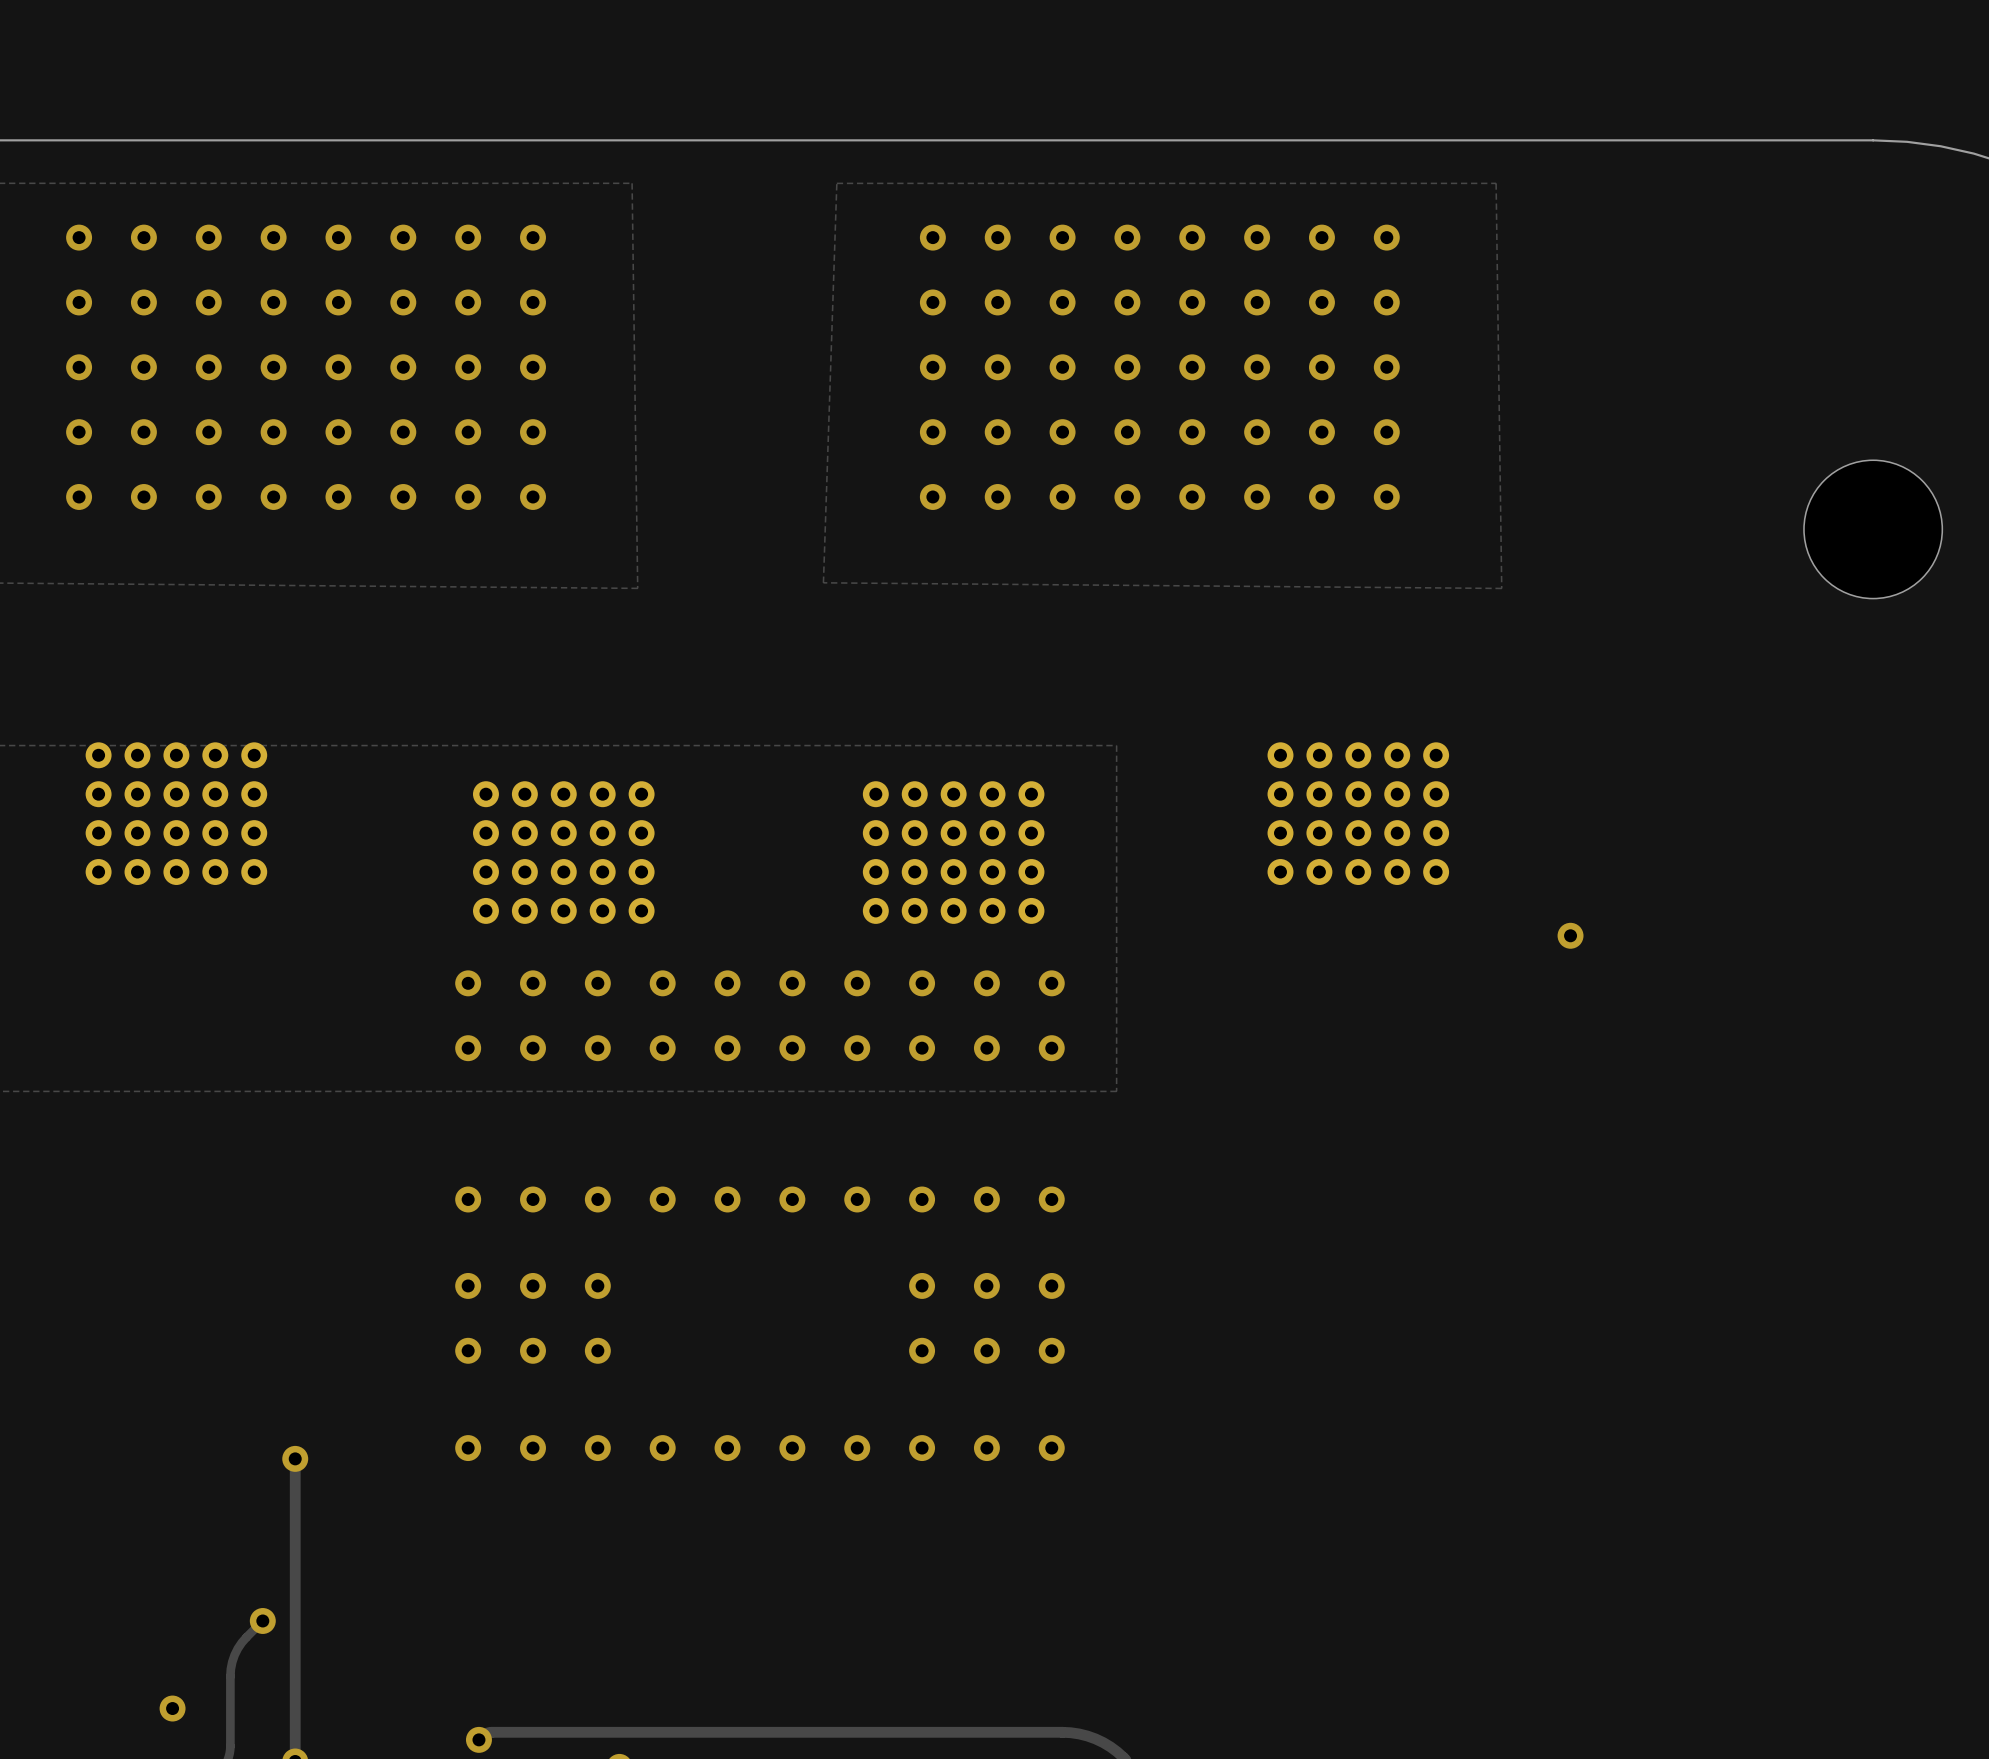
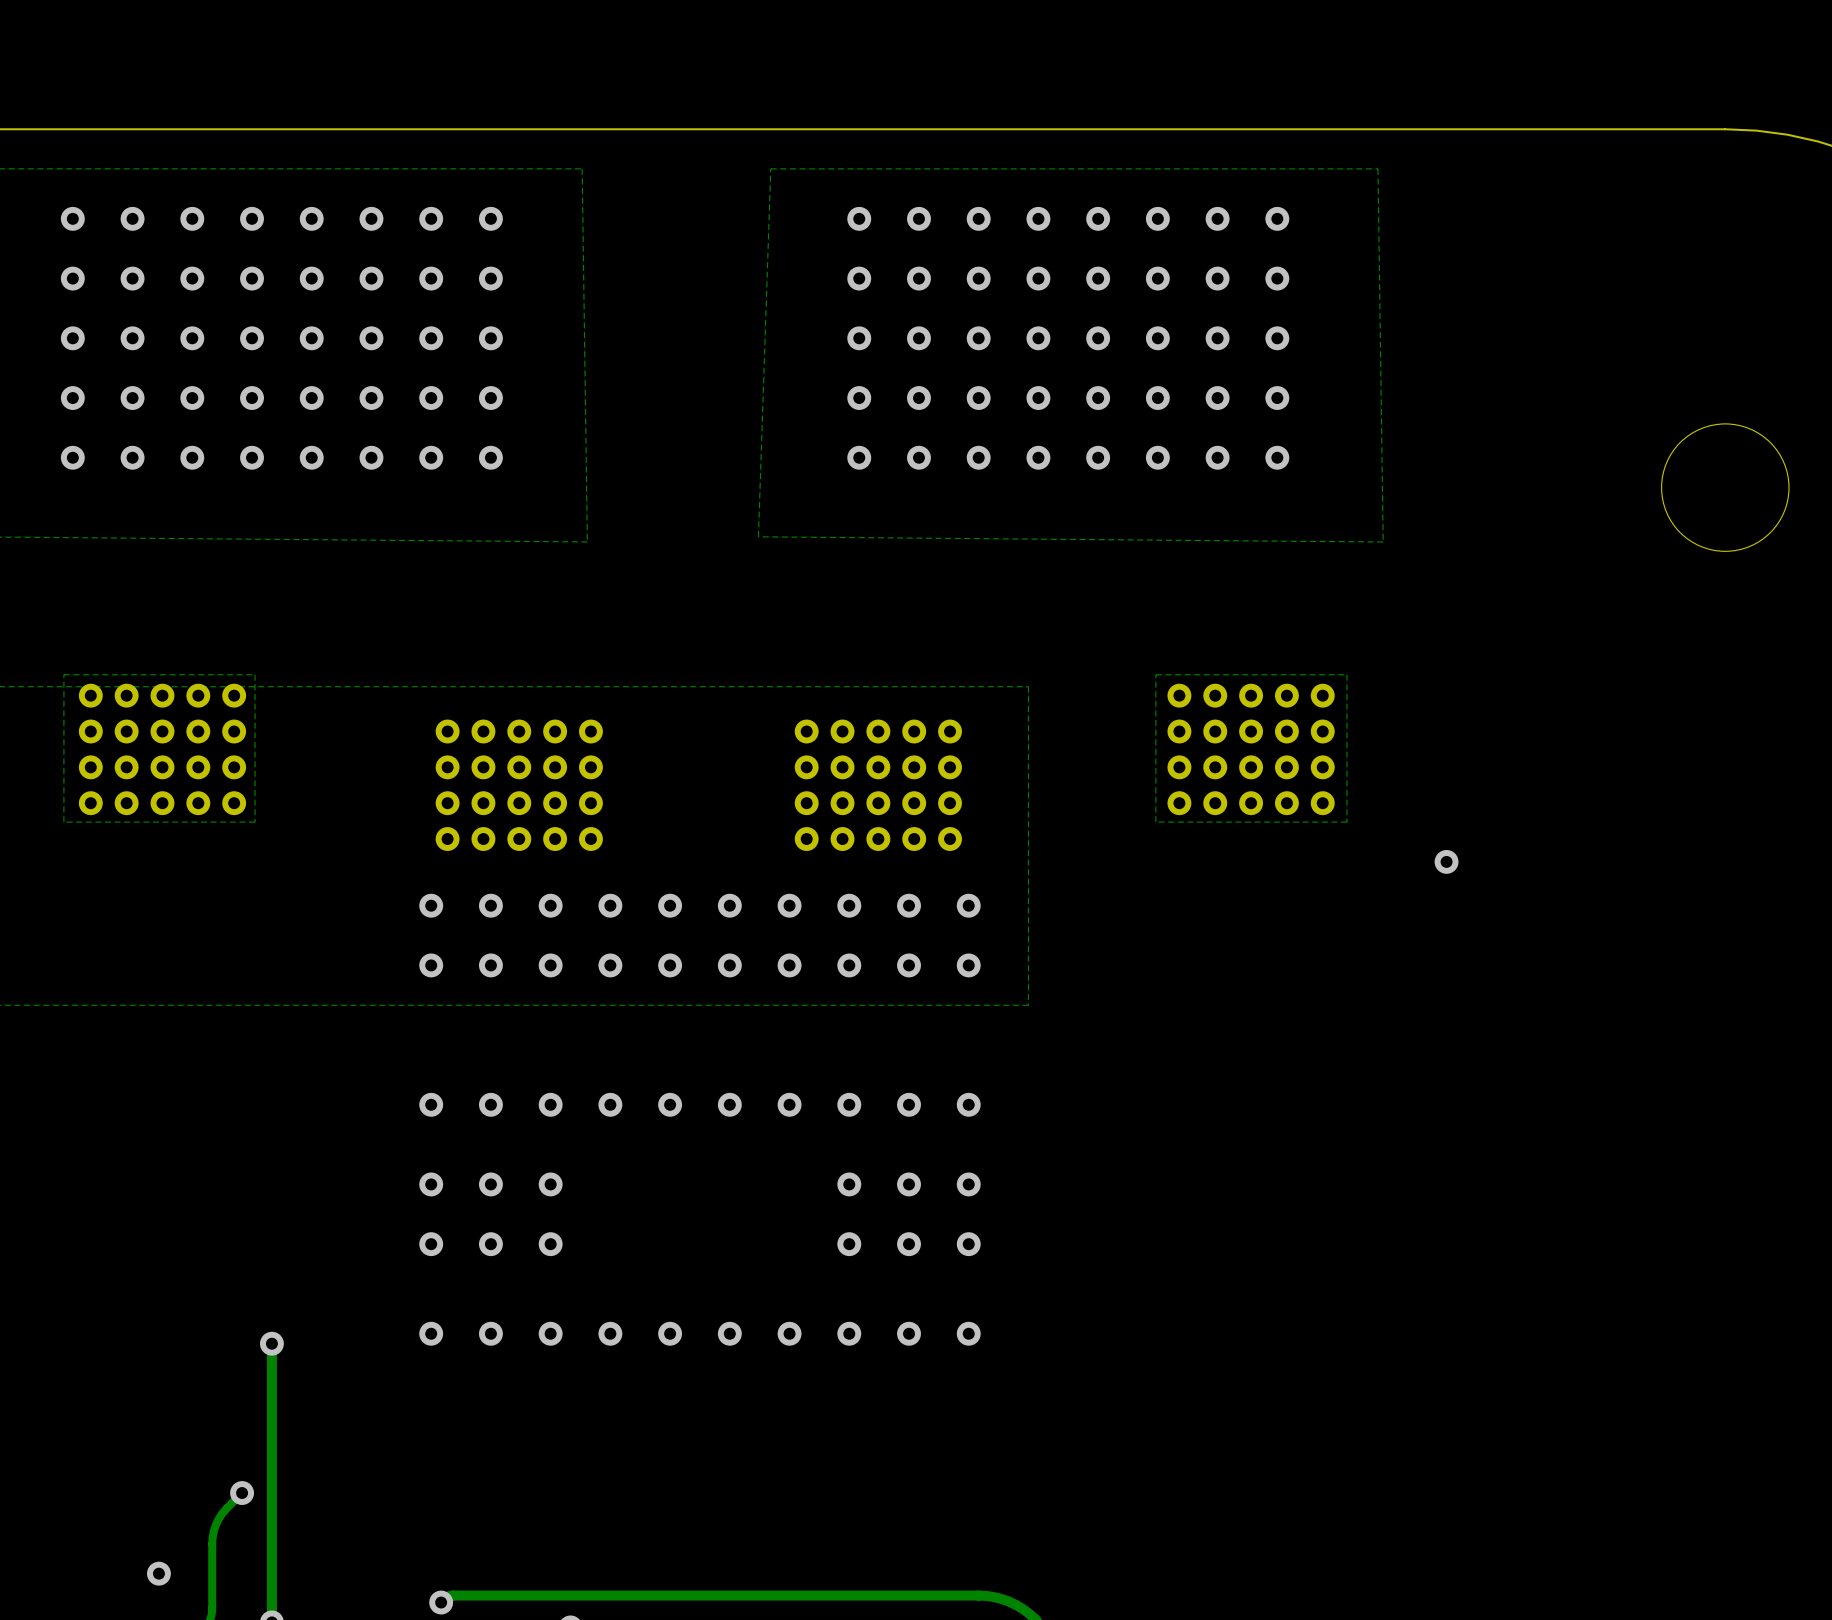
zone outline: none -> (255, 674) (255, 822) (63, 822) (63, 674) (255, 674)
zone outline: none -> (1347, 674) (1155, 674) (1155, 822) (1347, 822) (1347, 674)

